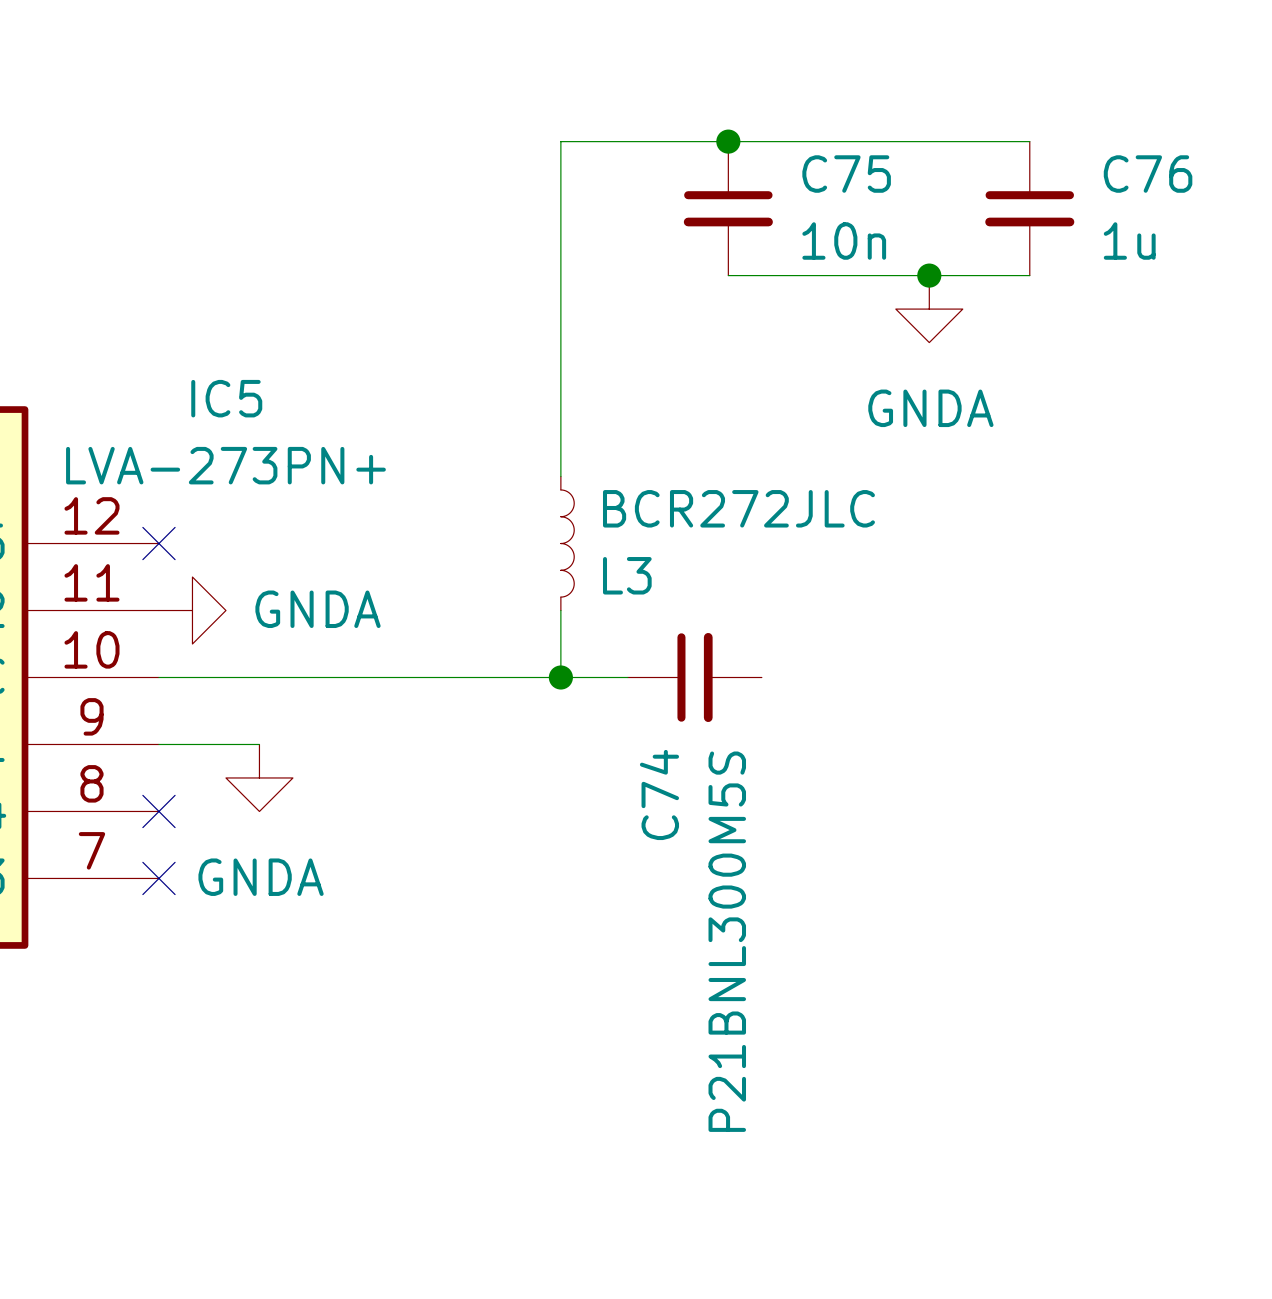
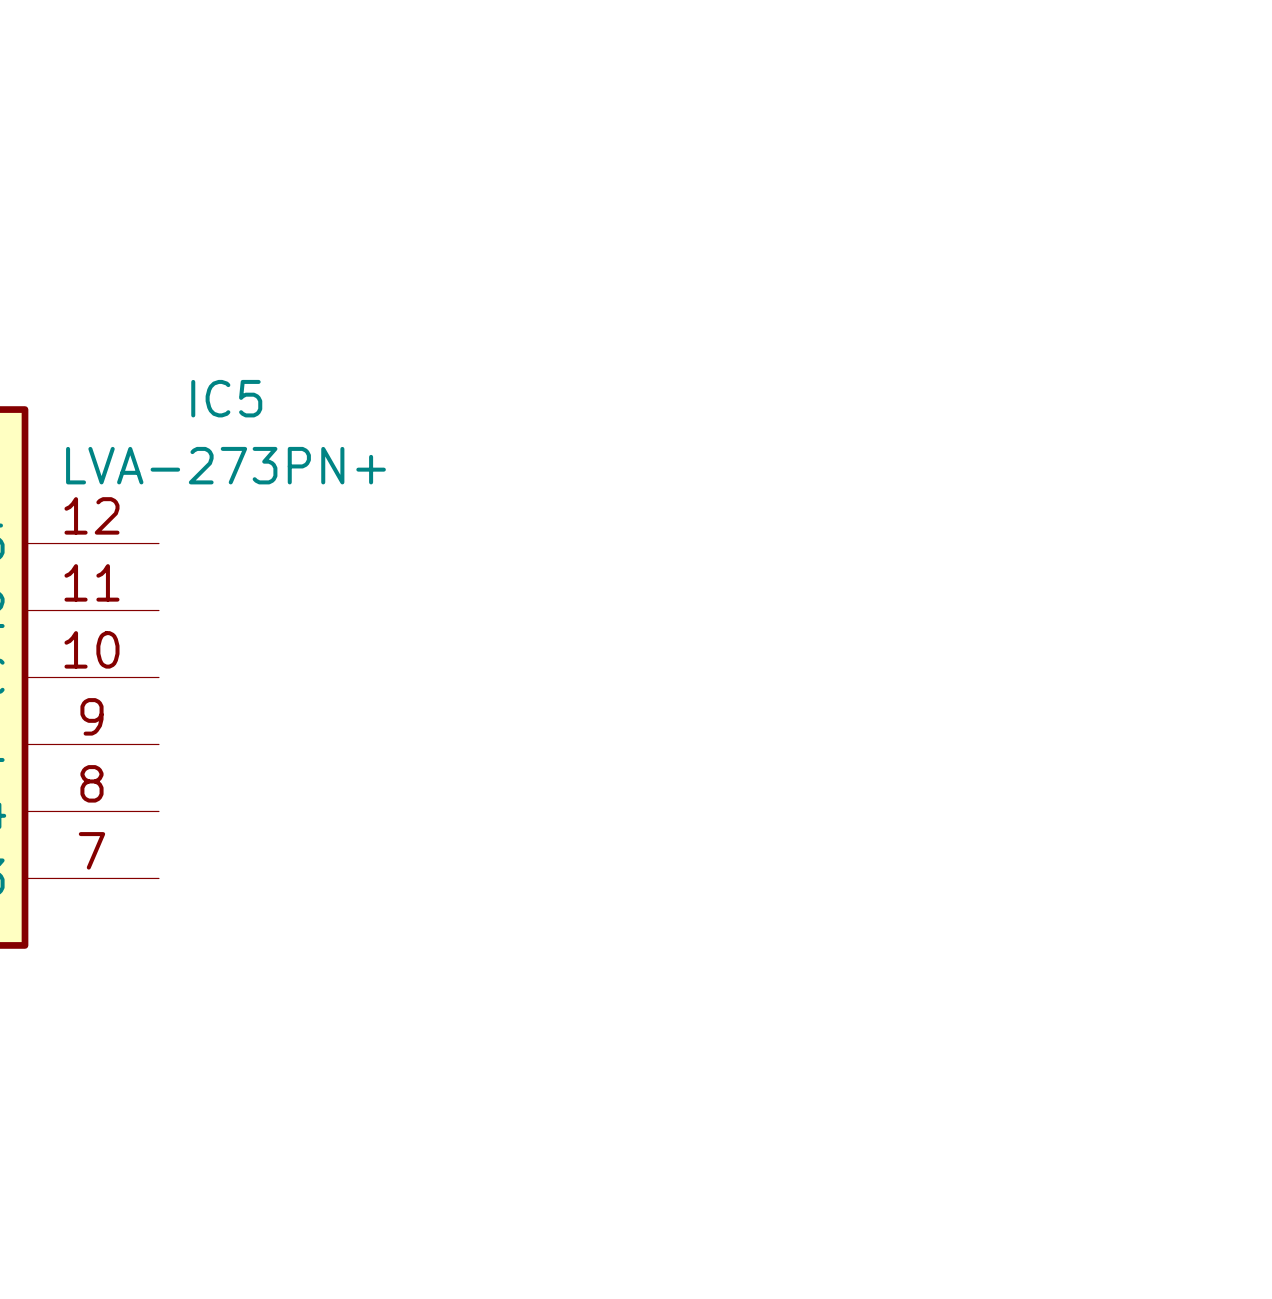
junction: (728, 141) -> none
wire: (1029, 141) (560, 141) (560, 476) -> none
C75: 10n (728, 208) -> none
C76: 1u (1029, 208) -> none
wire: (728, 275) (1029, 275) -> none
junction: (929, 275) -> none
power symbol: GNDA (929, 309) -> none
no-connect mark: (158, 543) -> none
L3: BCR272JLC (567, 543) -> none
power symbol: GNDA (192, 610) -> none
wire: (560, 610) (560, 677) -> none
wire: (158, 677) (627, 677) -> none
junction: (560, 677) -> none
C74: P21BNL300M5S (694, 677) -> none
wire: (158, 744) (259, 744) -> none
power symbol: GNDA (259, 777) -> none
no-connect mark: (158, 811) -> none
no-connect mark: (158, 878) -> none

